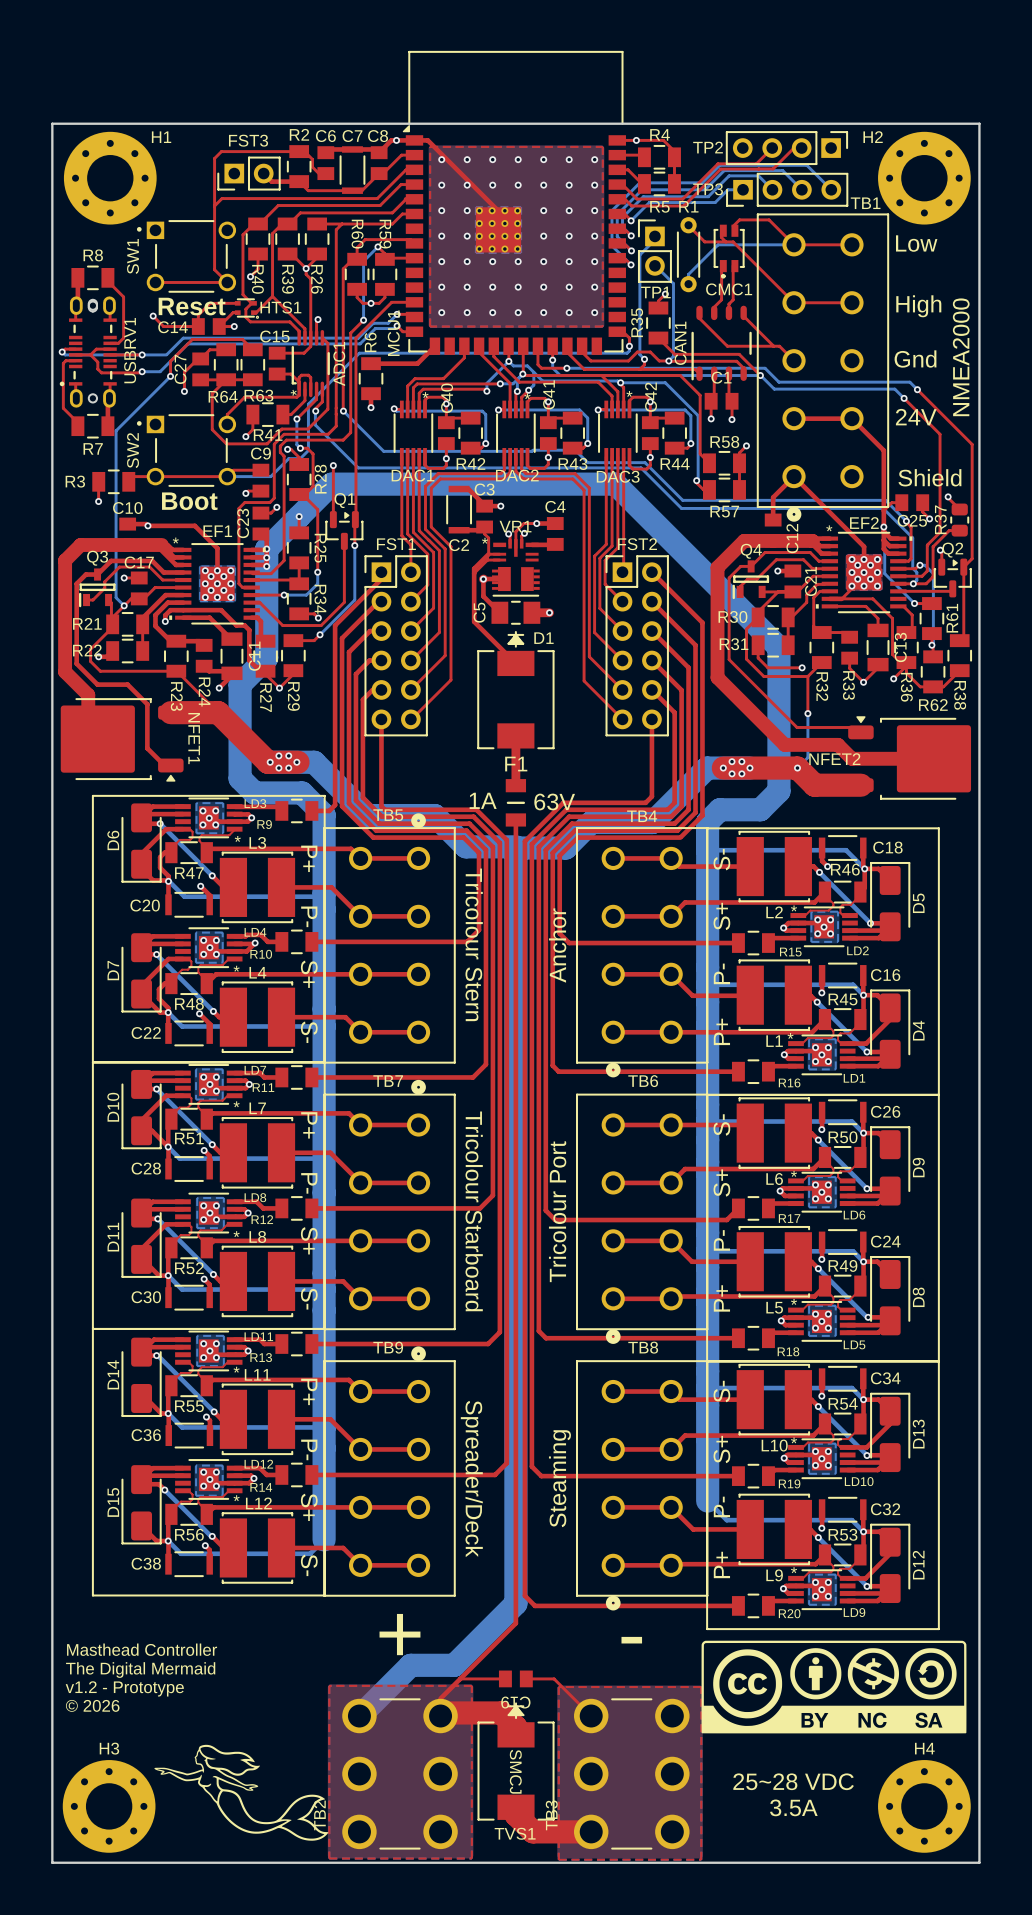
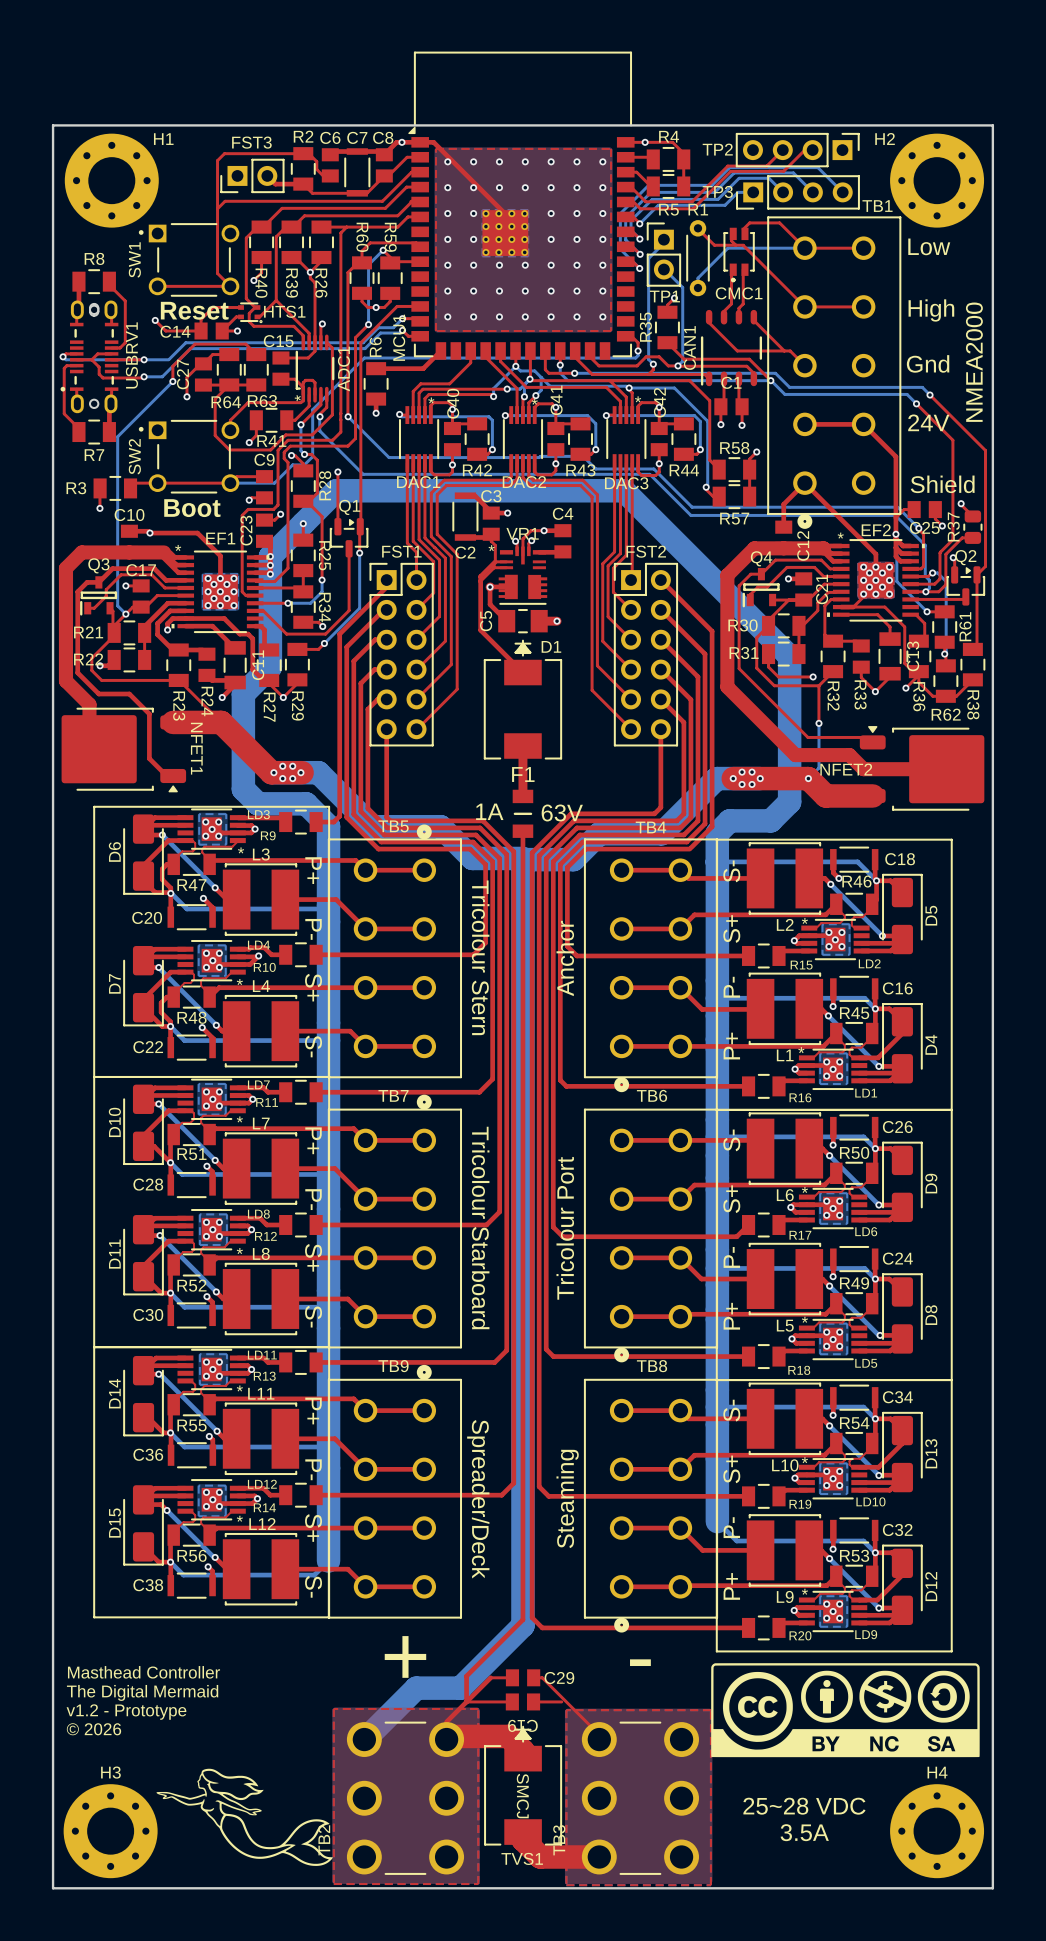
top track: (515, 1597) (515, 1623) (484, 1655) -> (522, 1619) (466, 1676) (466, 1701)
top track: none -> (490, 1677) (512, 1677)
C29: none -> (523, 1677)
top track: (554, 1678) (591, 1716) -> (533, 1677) (542, 1677) (599, 1734) (599, 1739)

